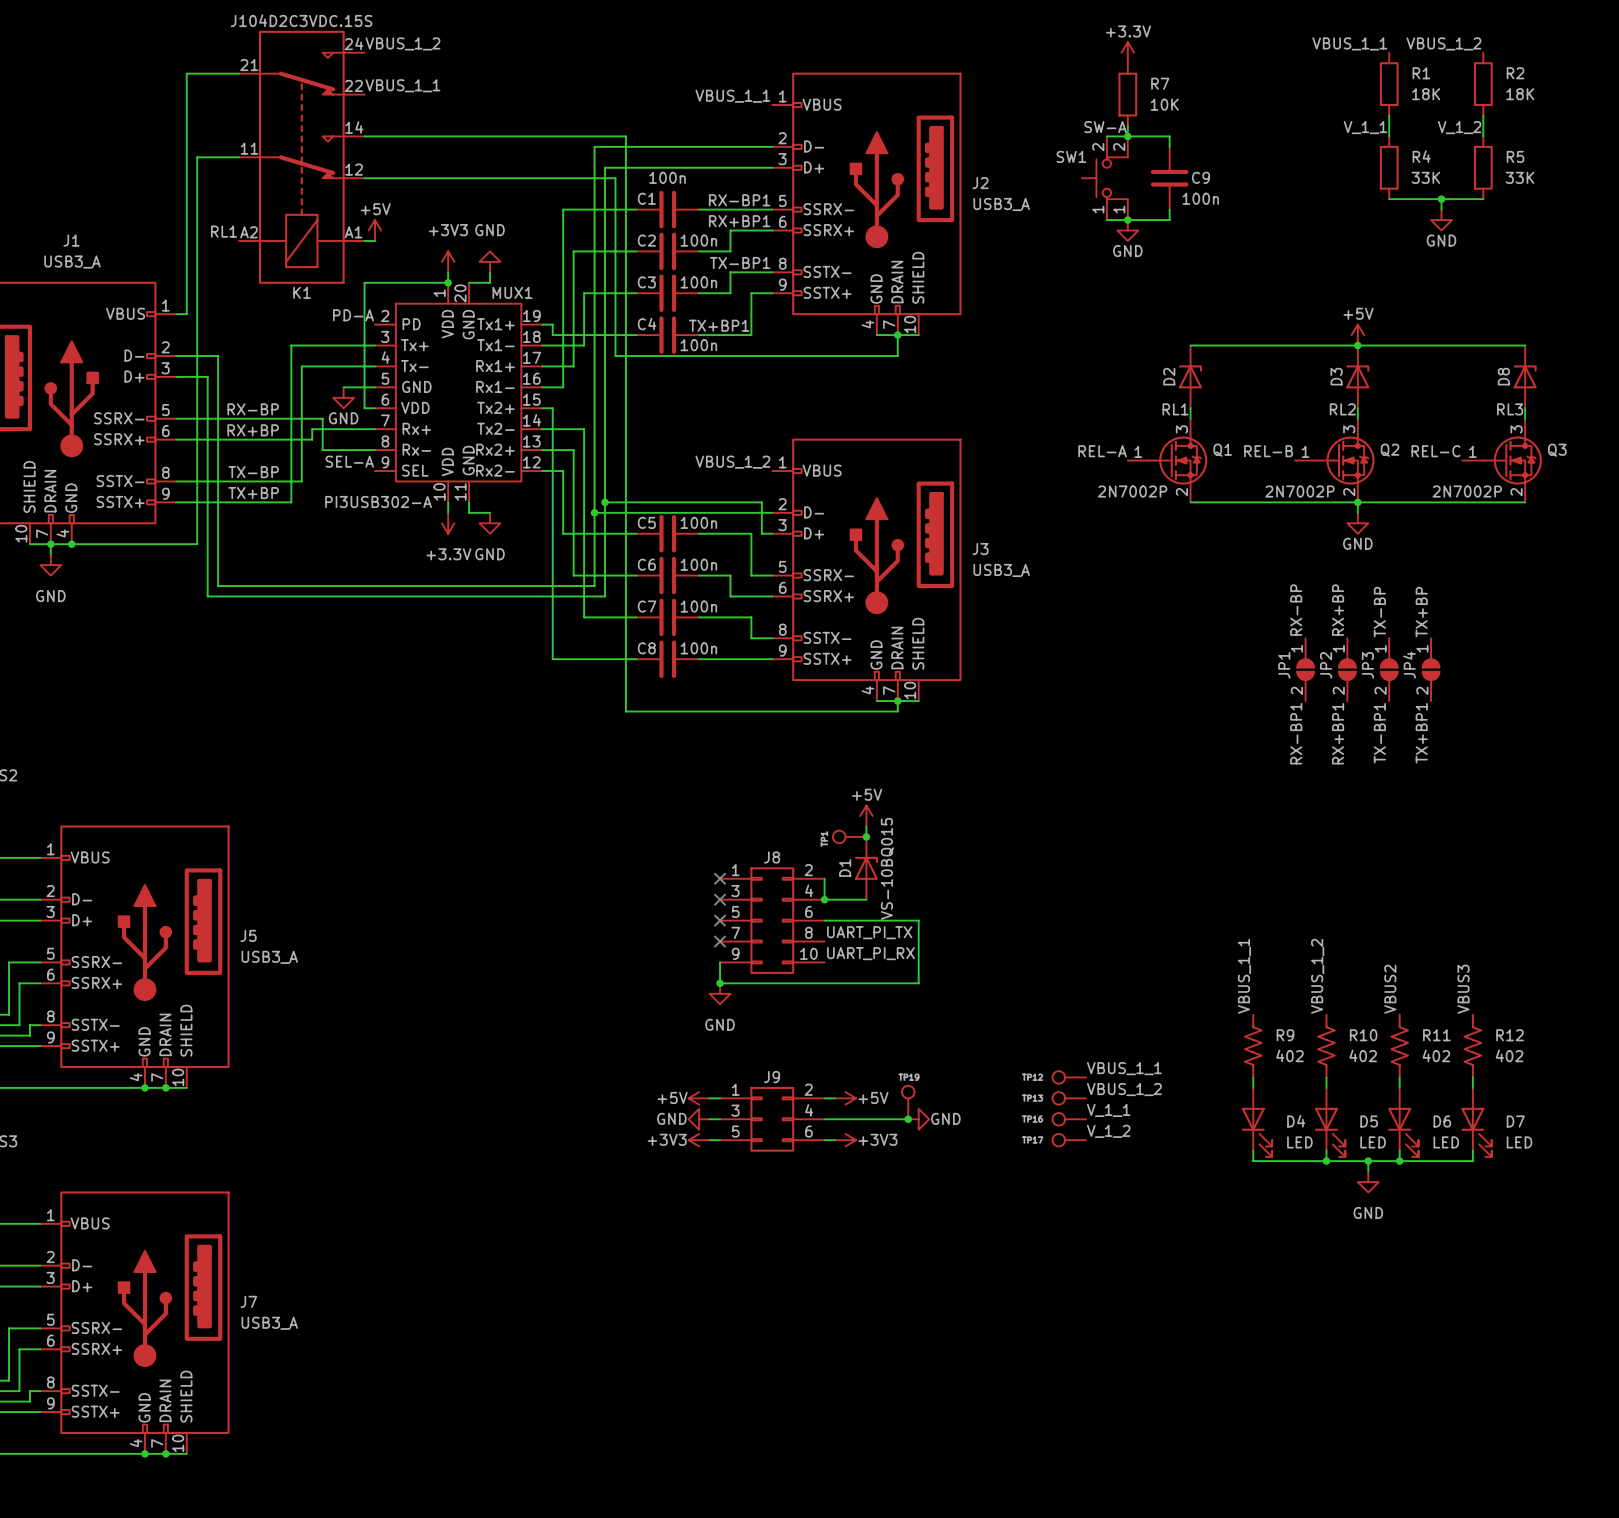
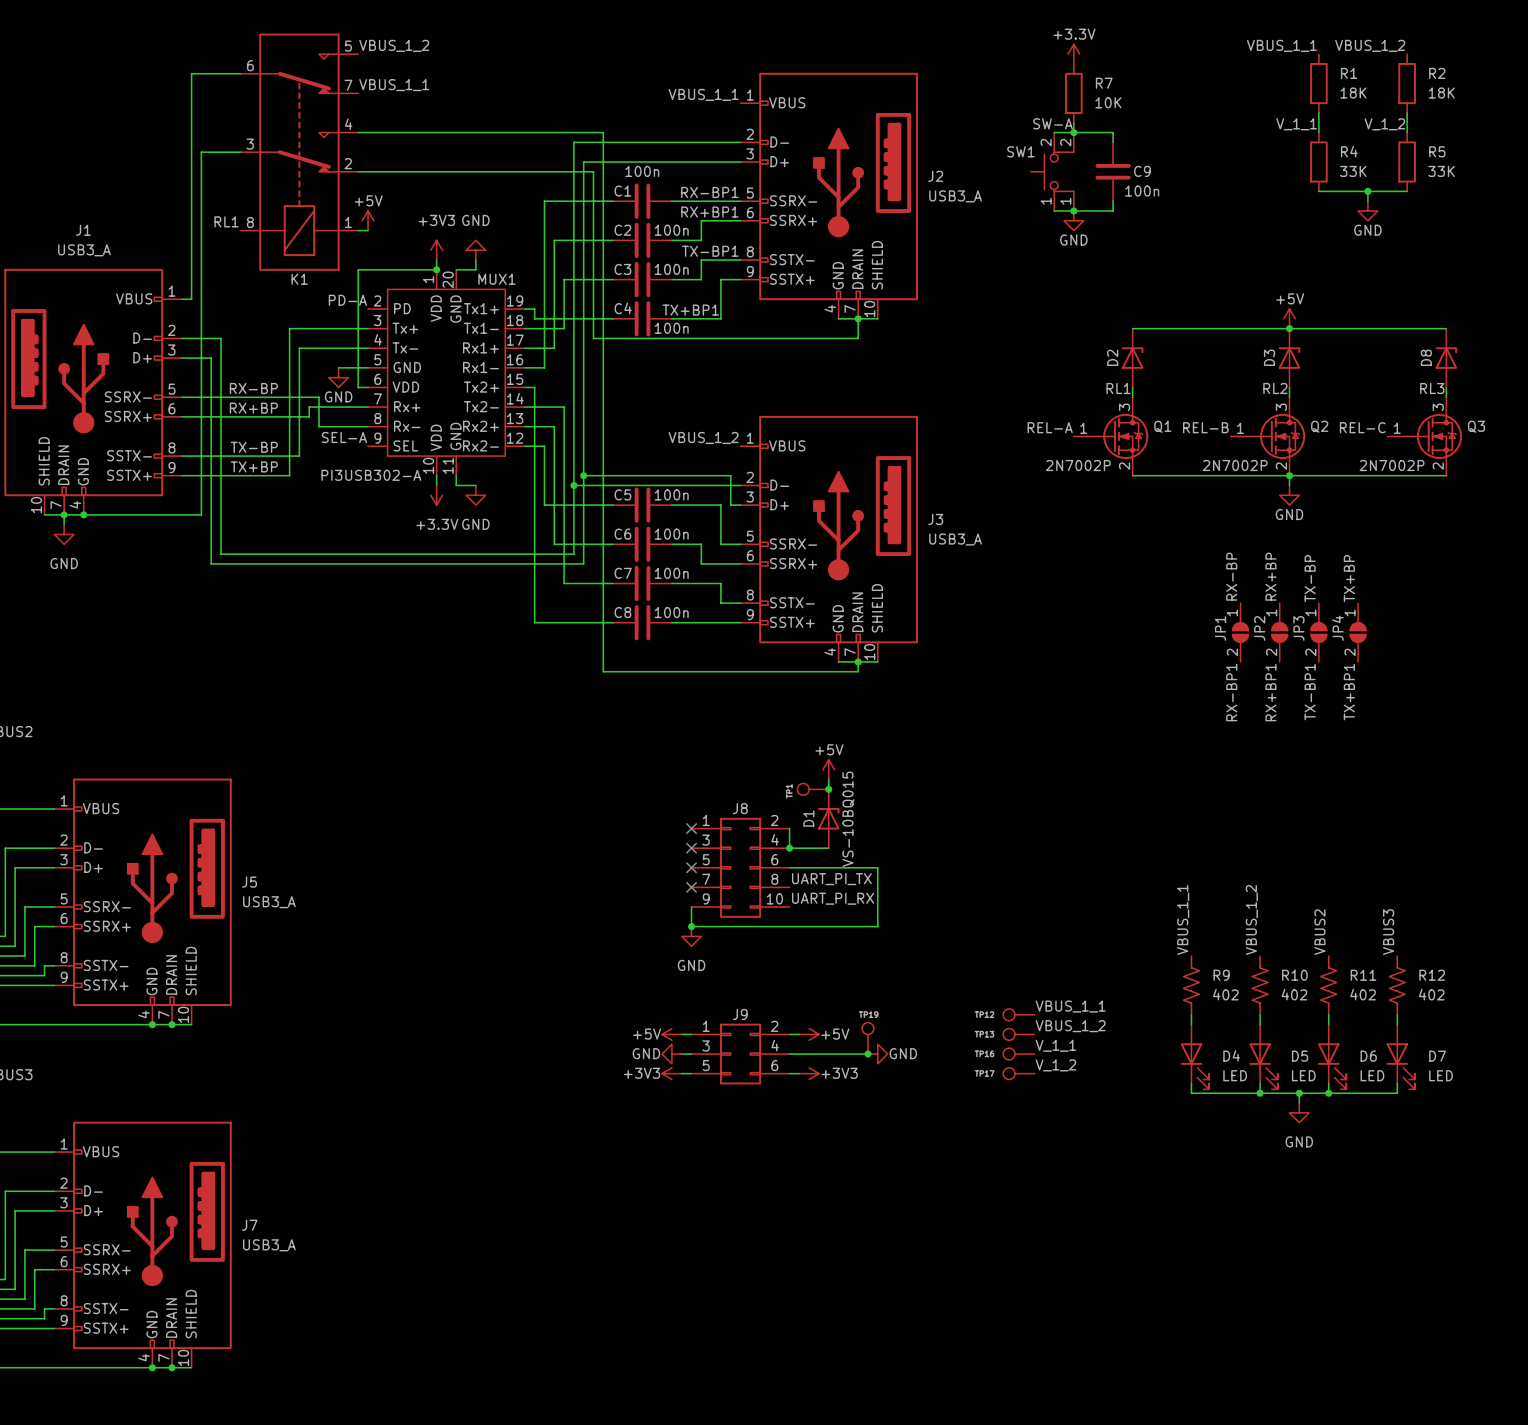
K1 value: J104D2C3VDC.15S (301, 20) -> none
K1 pin number: 24 (354, 43) -> 5 (348, 46)
K1 pin number: 21 (249, 65) -> 6 (250, 65)
K1 pin number: 22 (353, 85) -> 7 (348, 85)
K1 pin number: 14 (354, 127) -> 4 (348, 124)
K1 pin number: 11 (249, 148) -> 3 (250, 144)
K1 pin number: 12 (354, 169) -> 2 (348, 163)
K1 pin number: A2 (249, 232) -> 8 (250, 222)
K1 pin number: A1 (353, 232) -> 1 (348, 222)

